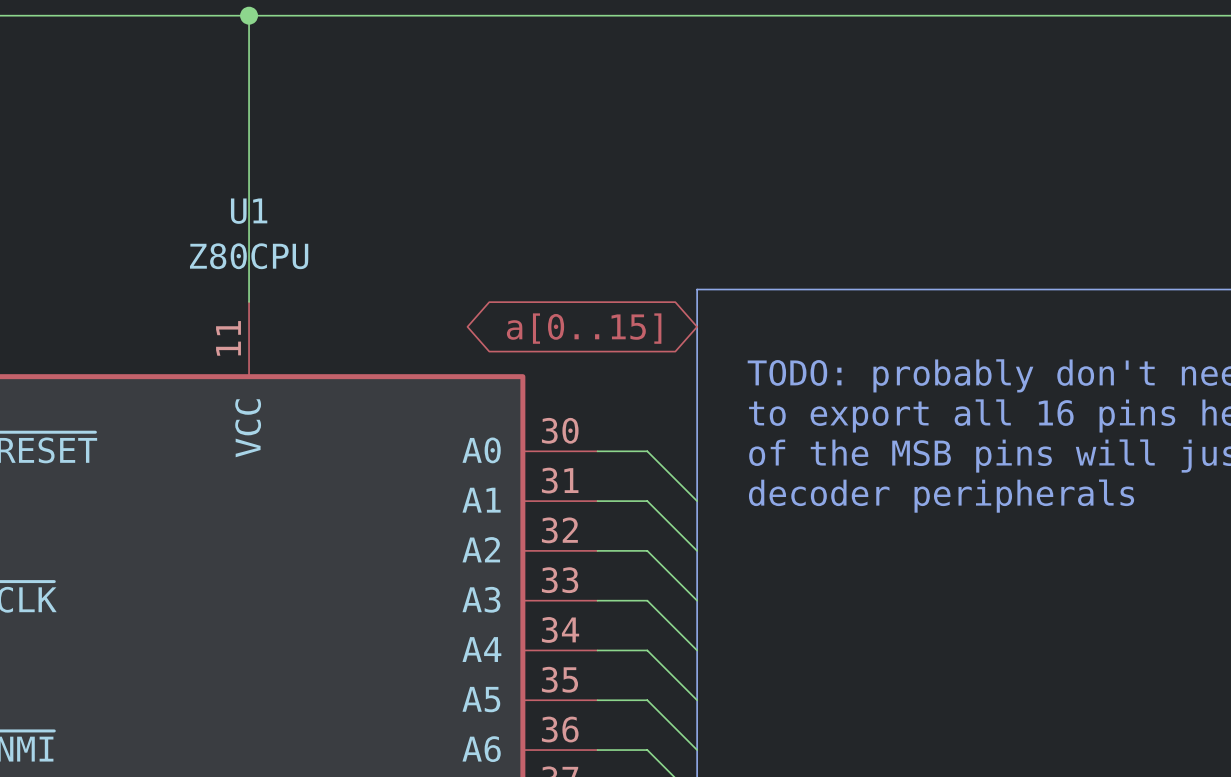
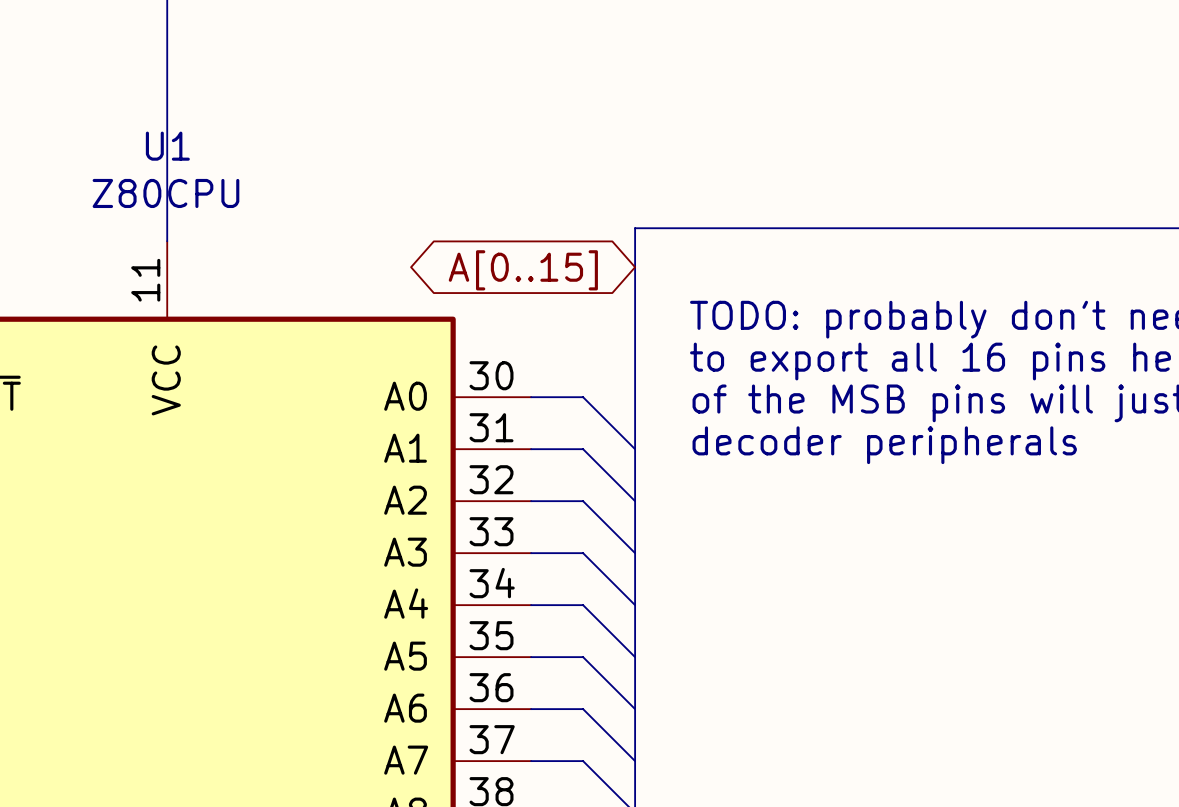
global label: a[0..15] (584, 328) -> A[0..15] (523, 270)

